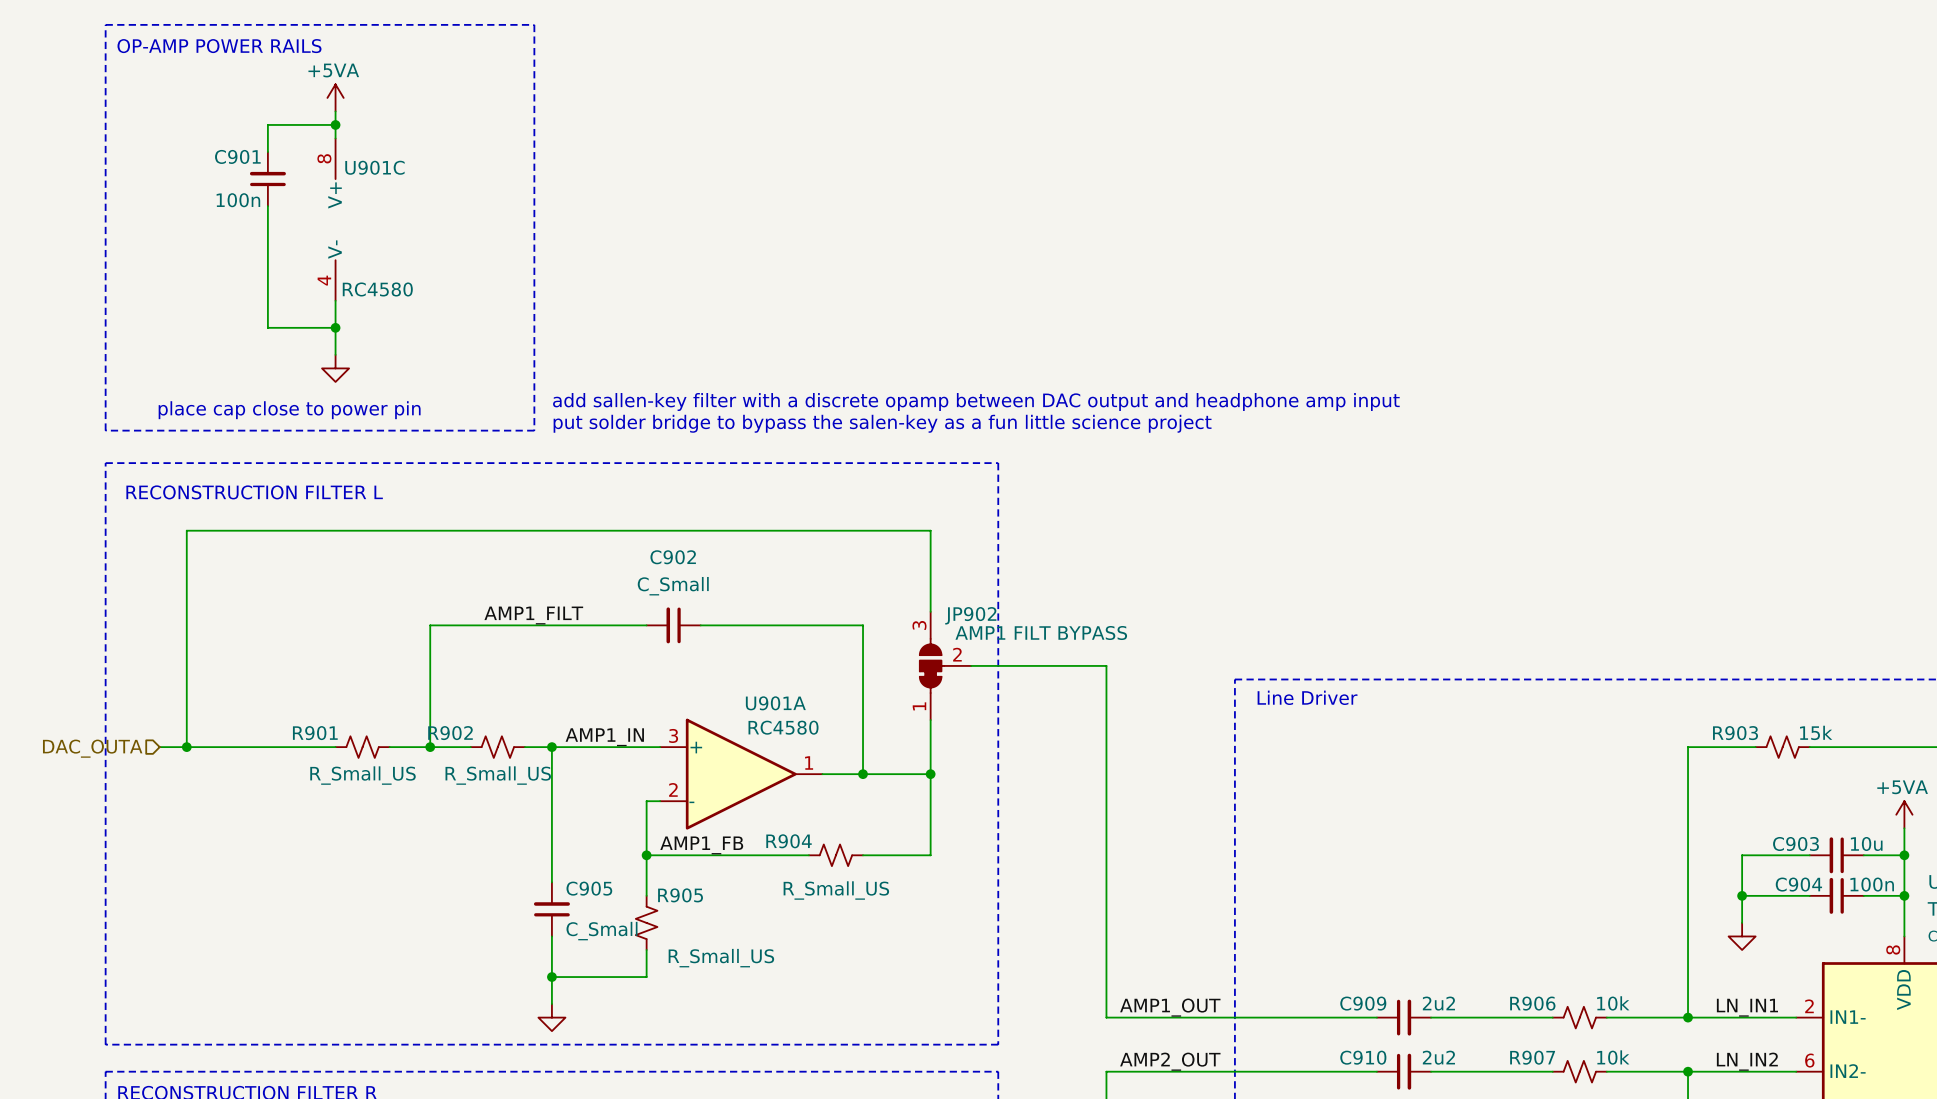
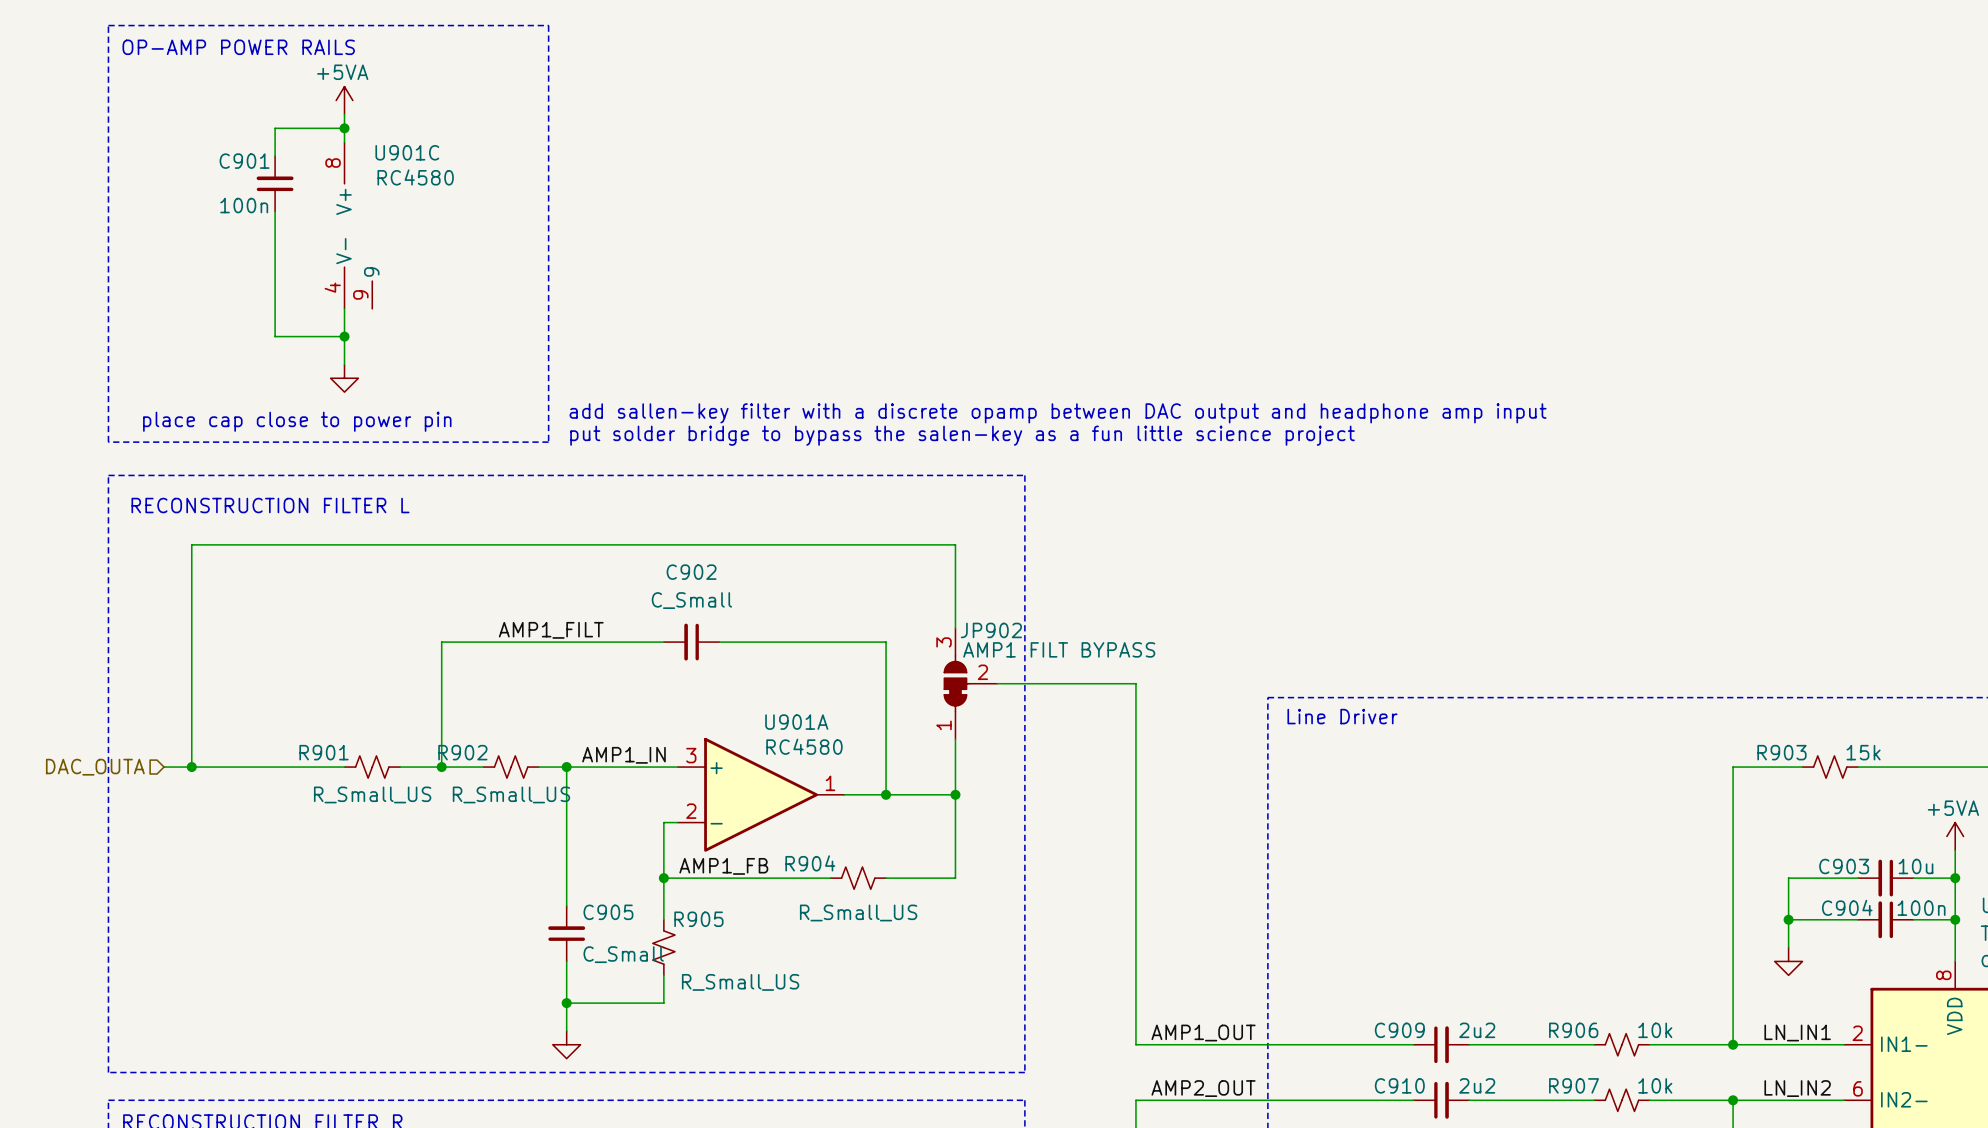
U901C symbol: [335, 138, 336, 301] -> [344, 142, 373, 309]
U901C value position: RC4580 (377, 289) -> RC4580 (415, 177)

